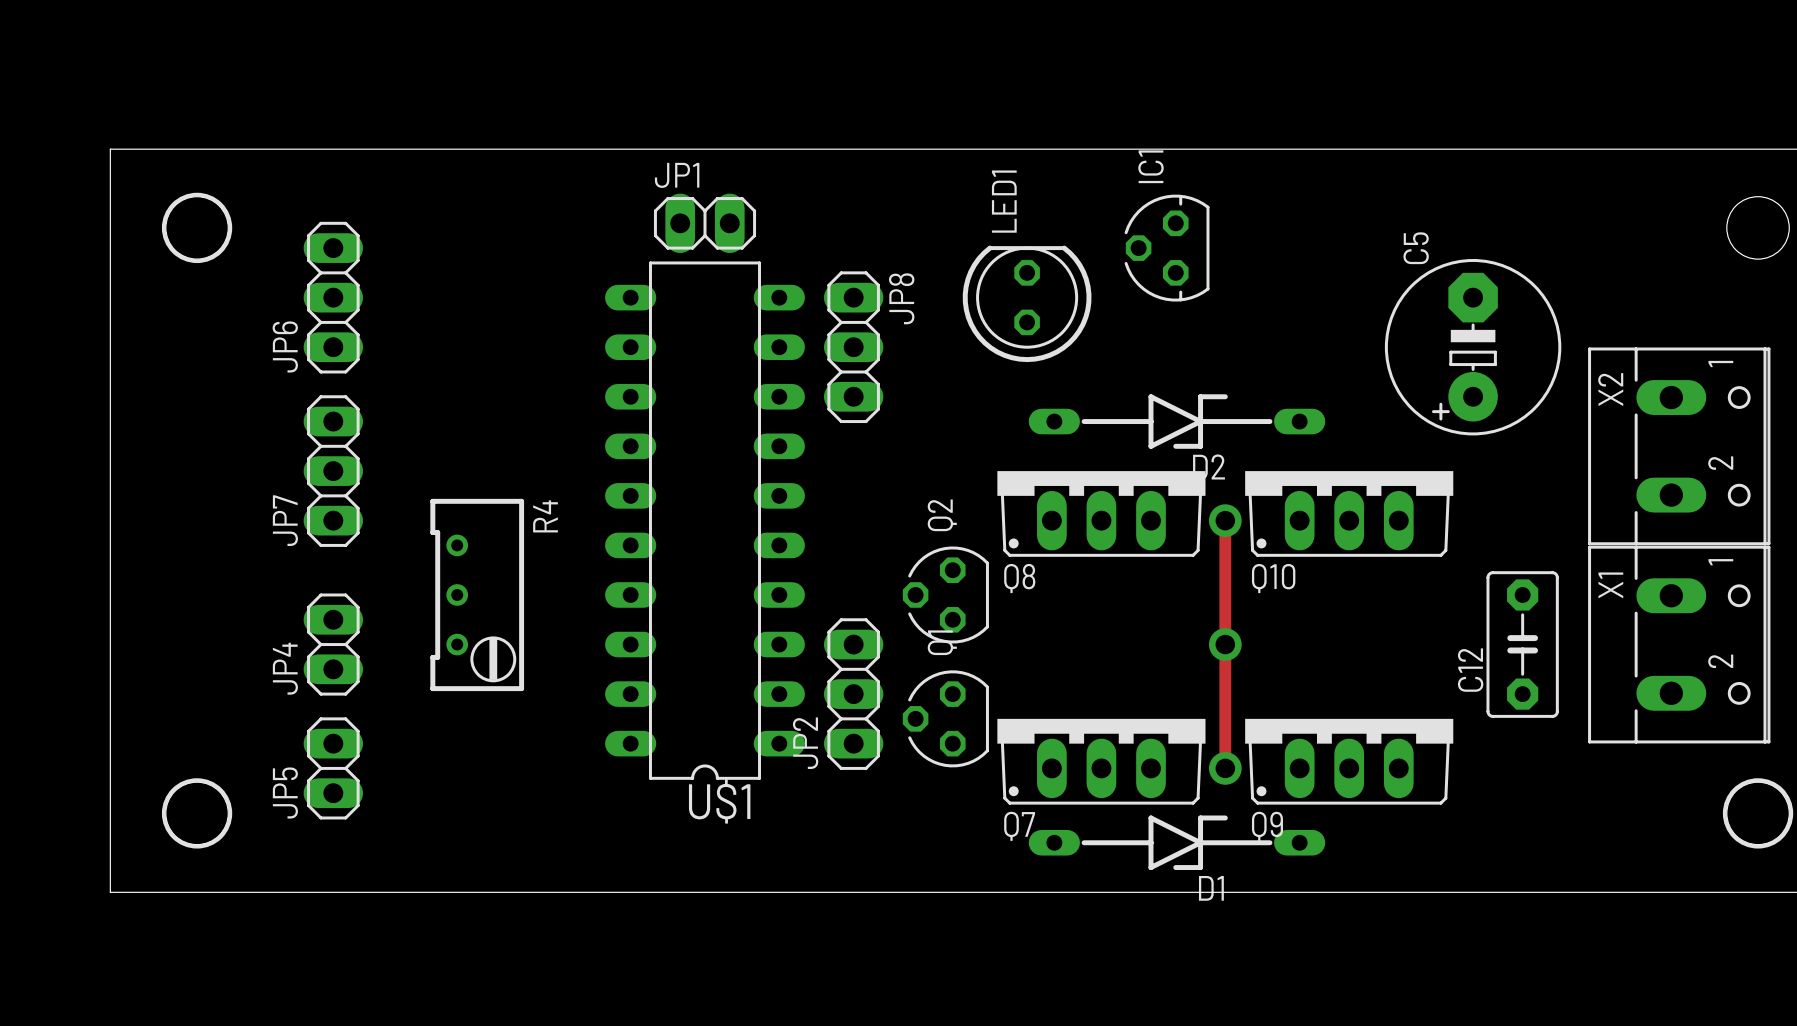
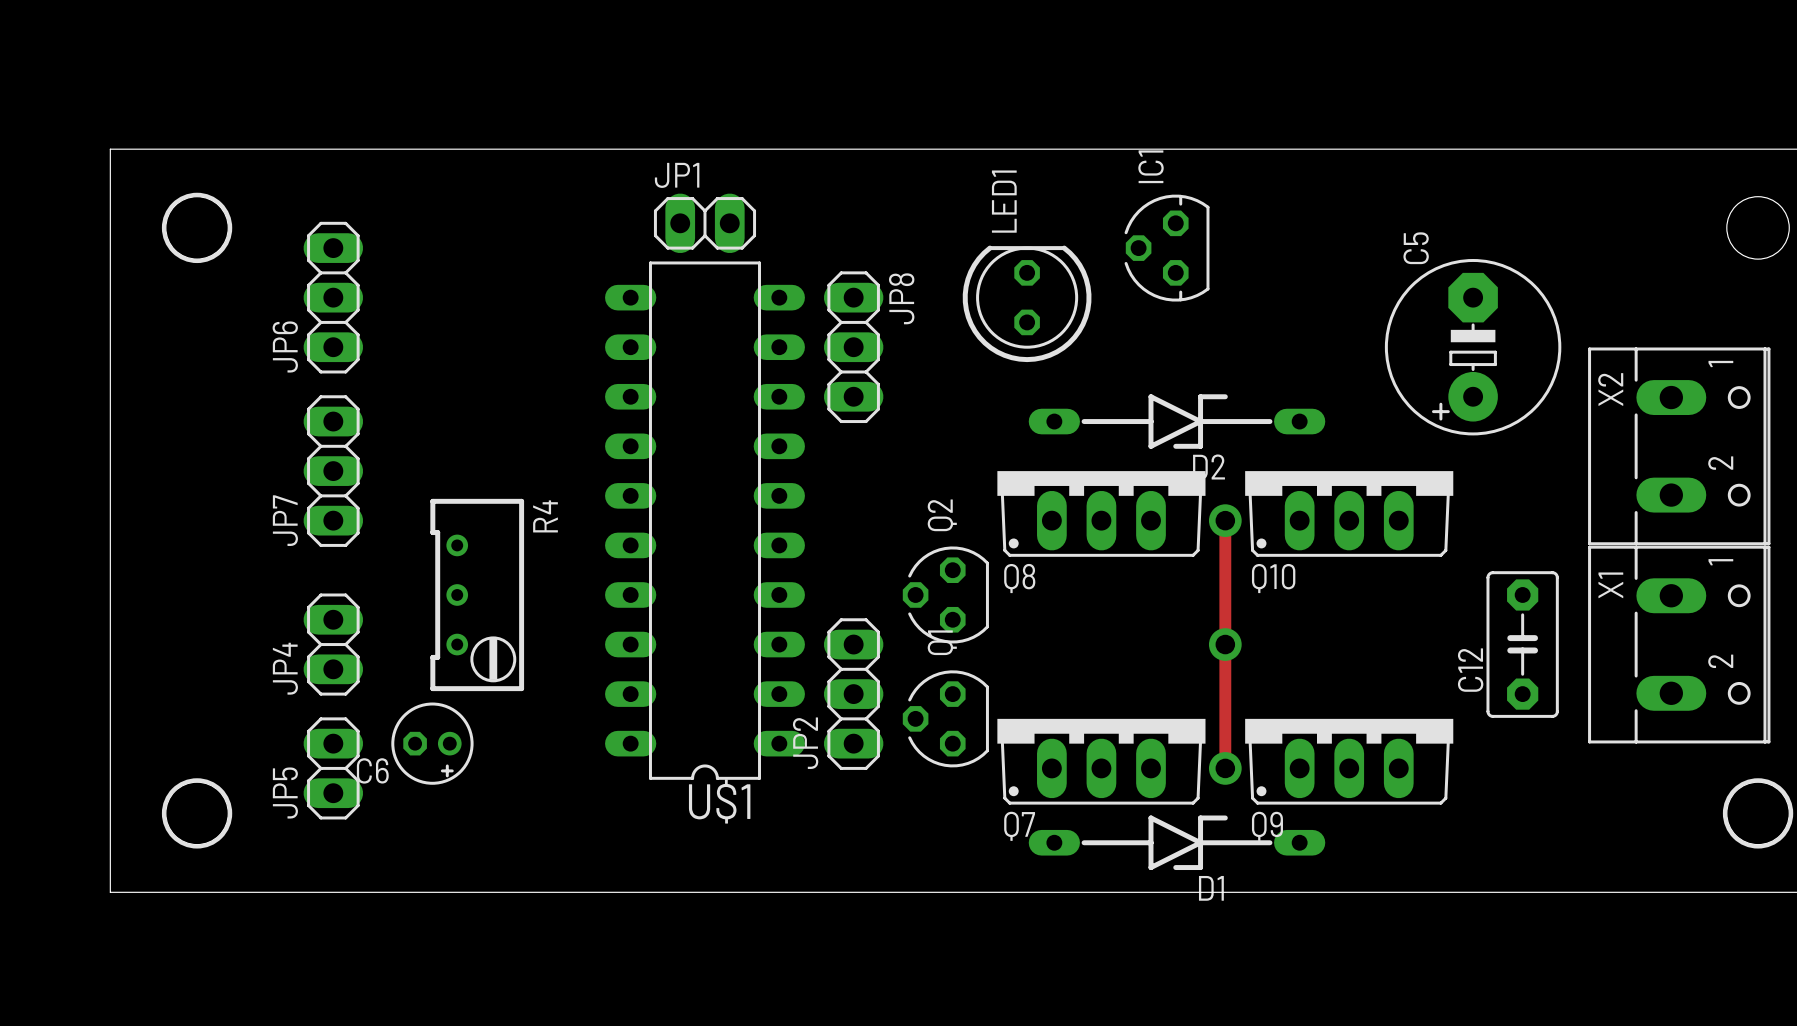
C6: none -> (432, 743)

